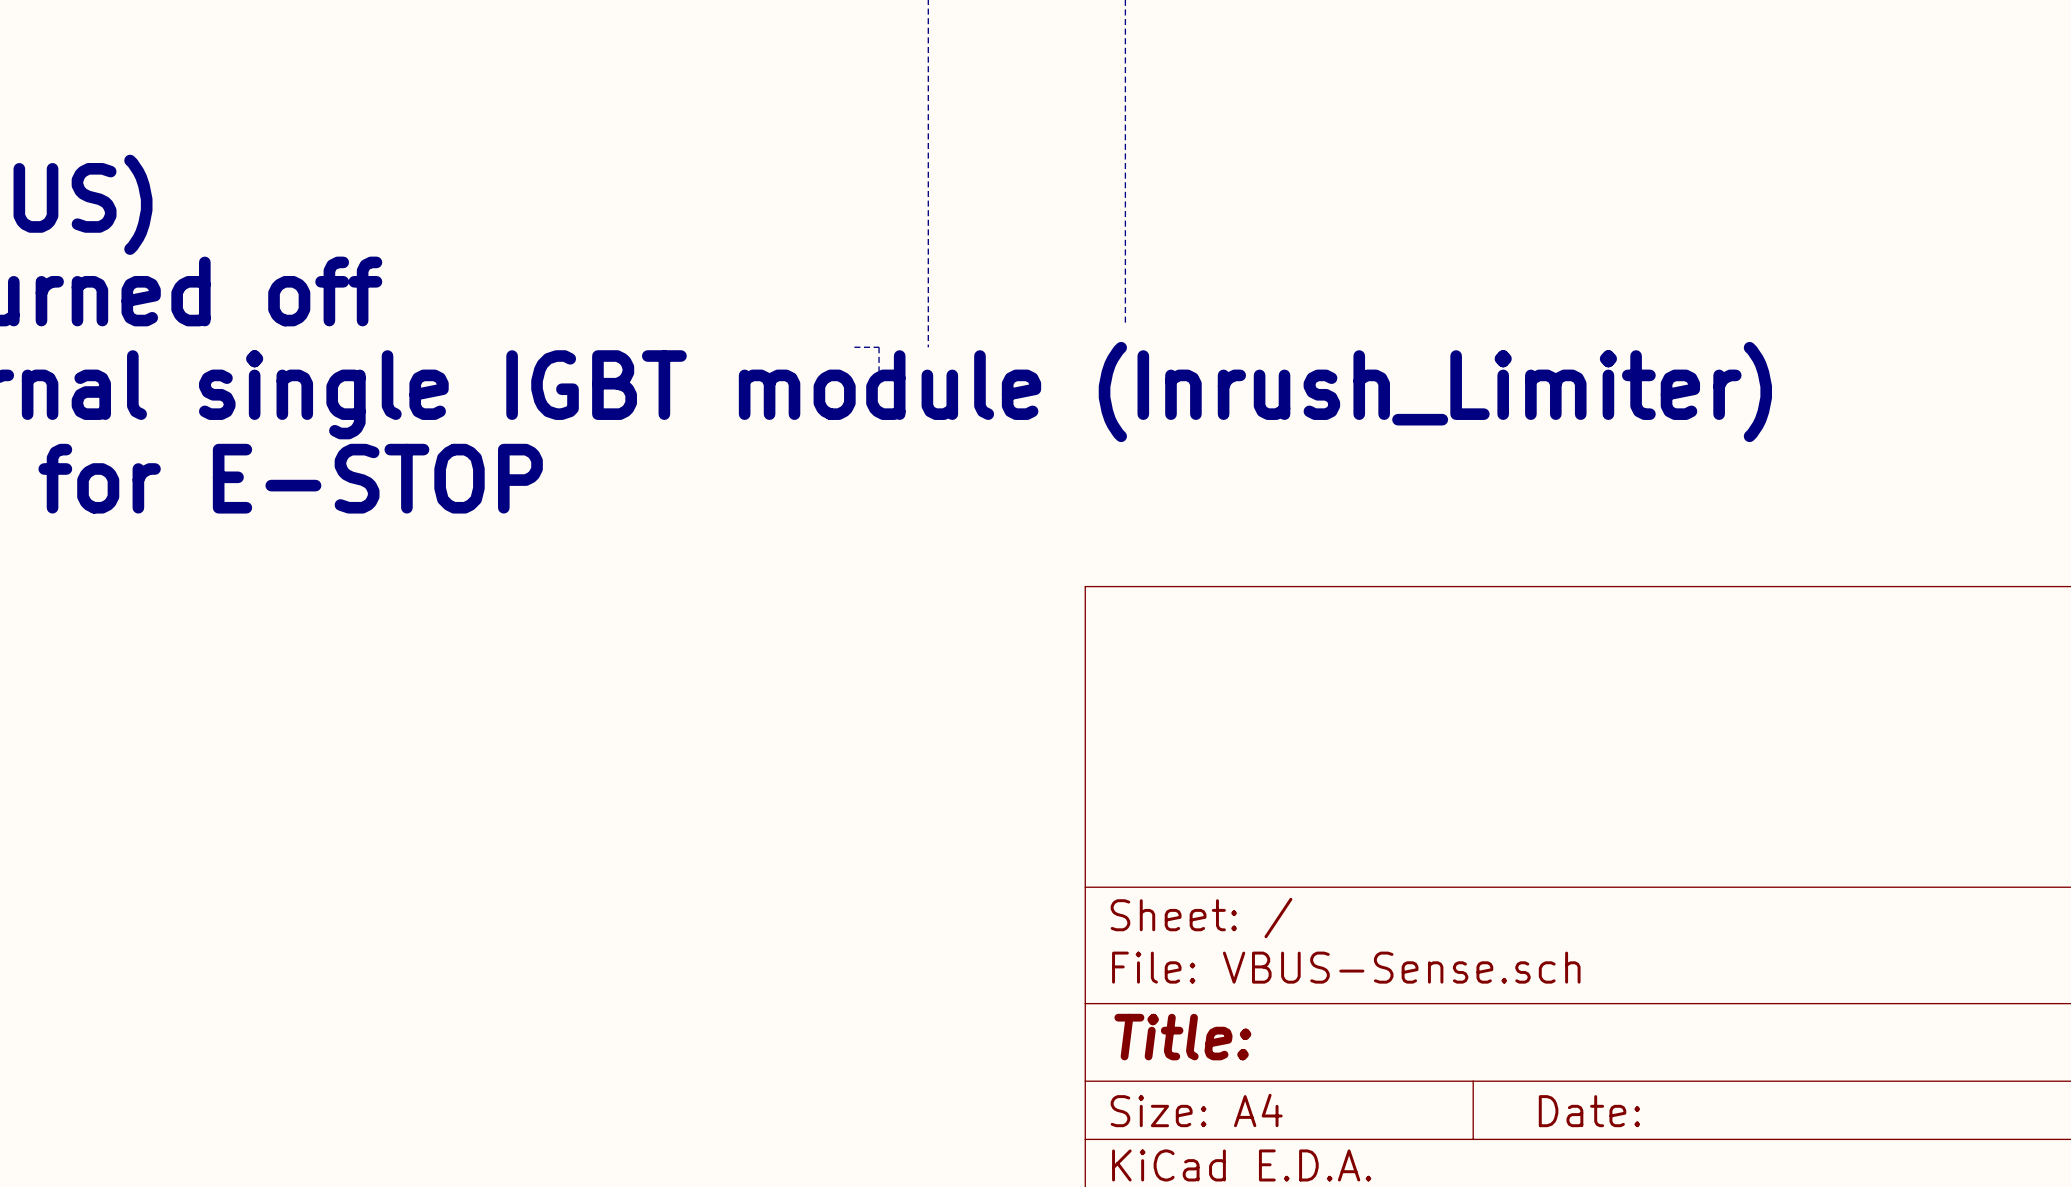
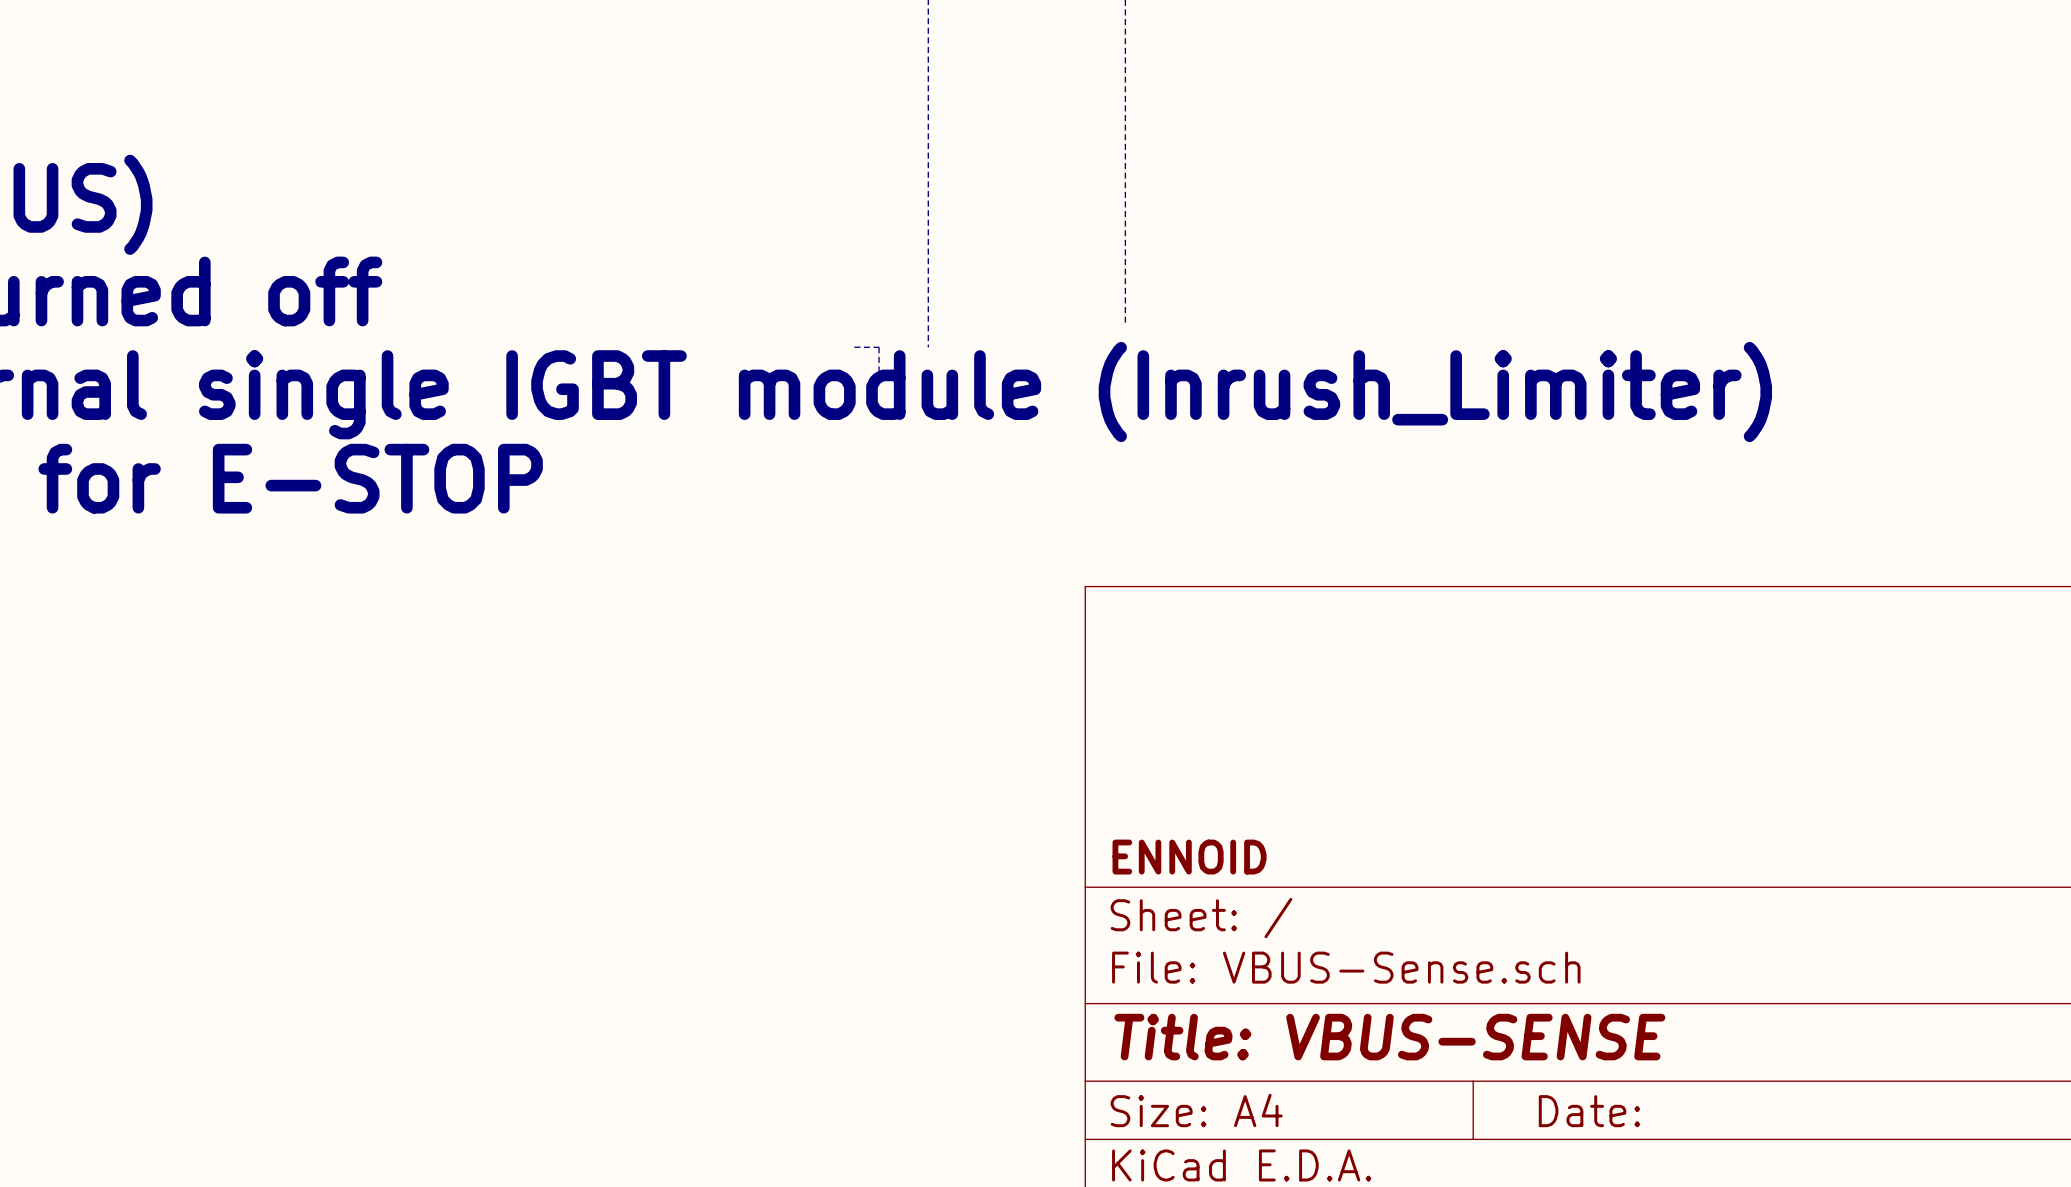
title block: none -> ENNOID (1189, 857)
title block: Title: (1182, 1037) -> Title: VBUS-SENSE (1389, 1037)

